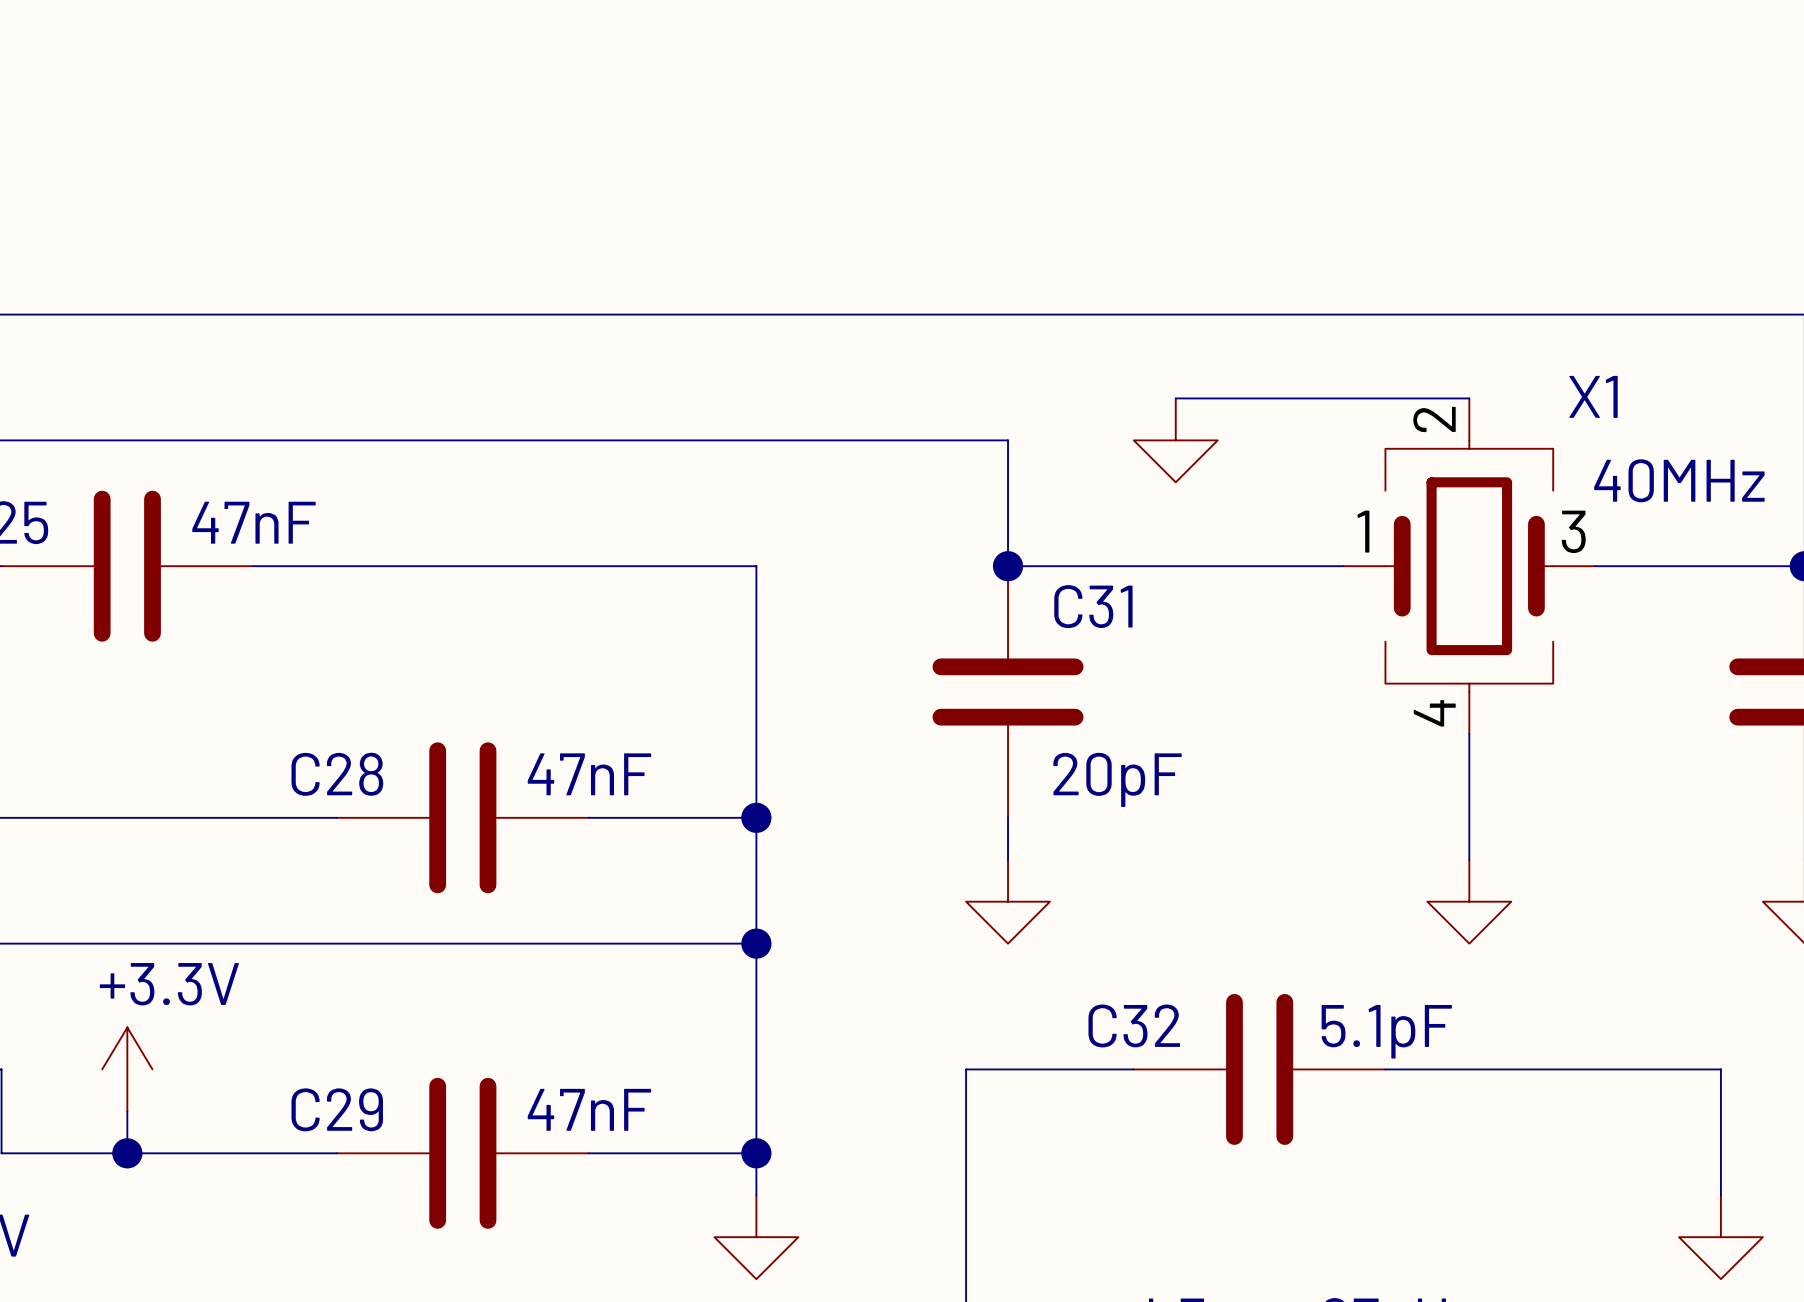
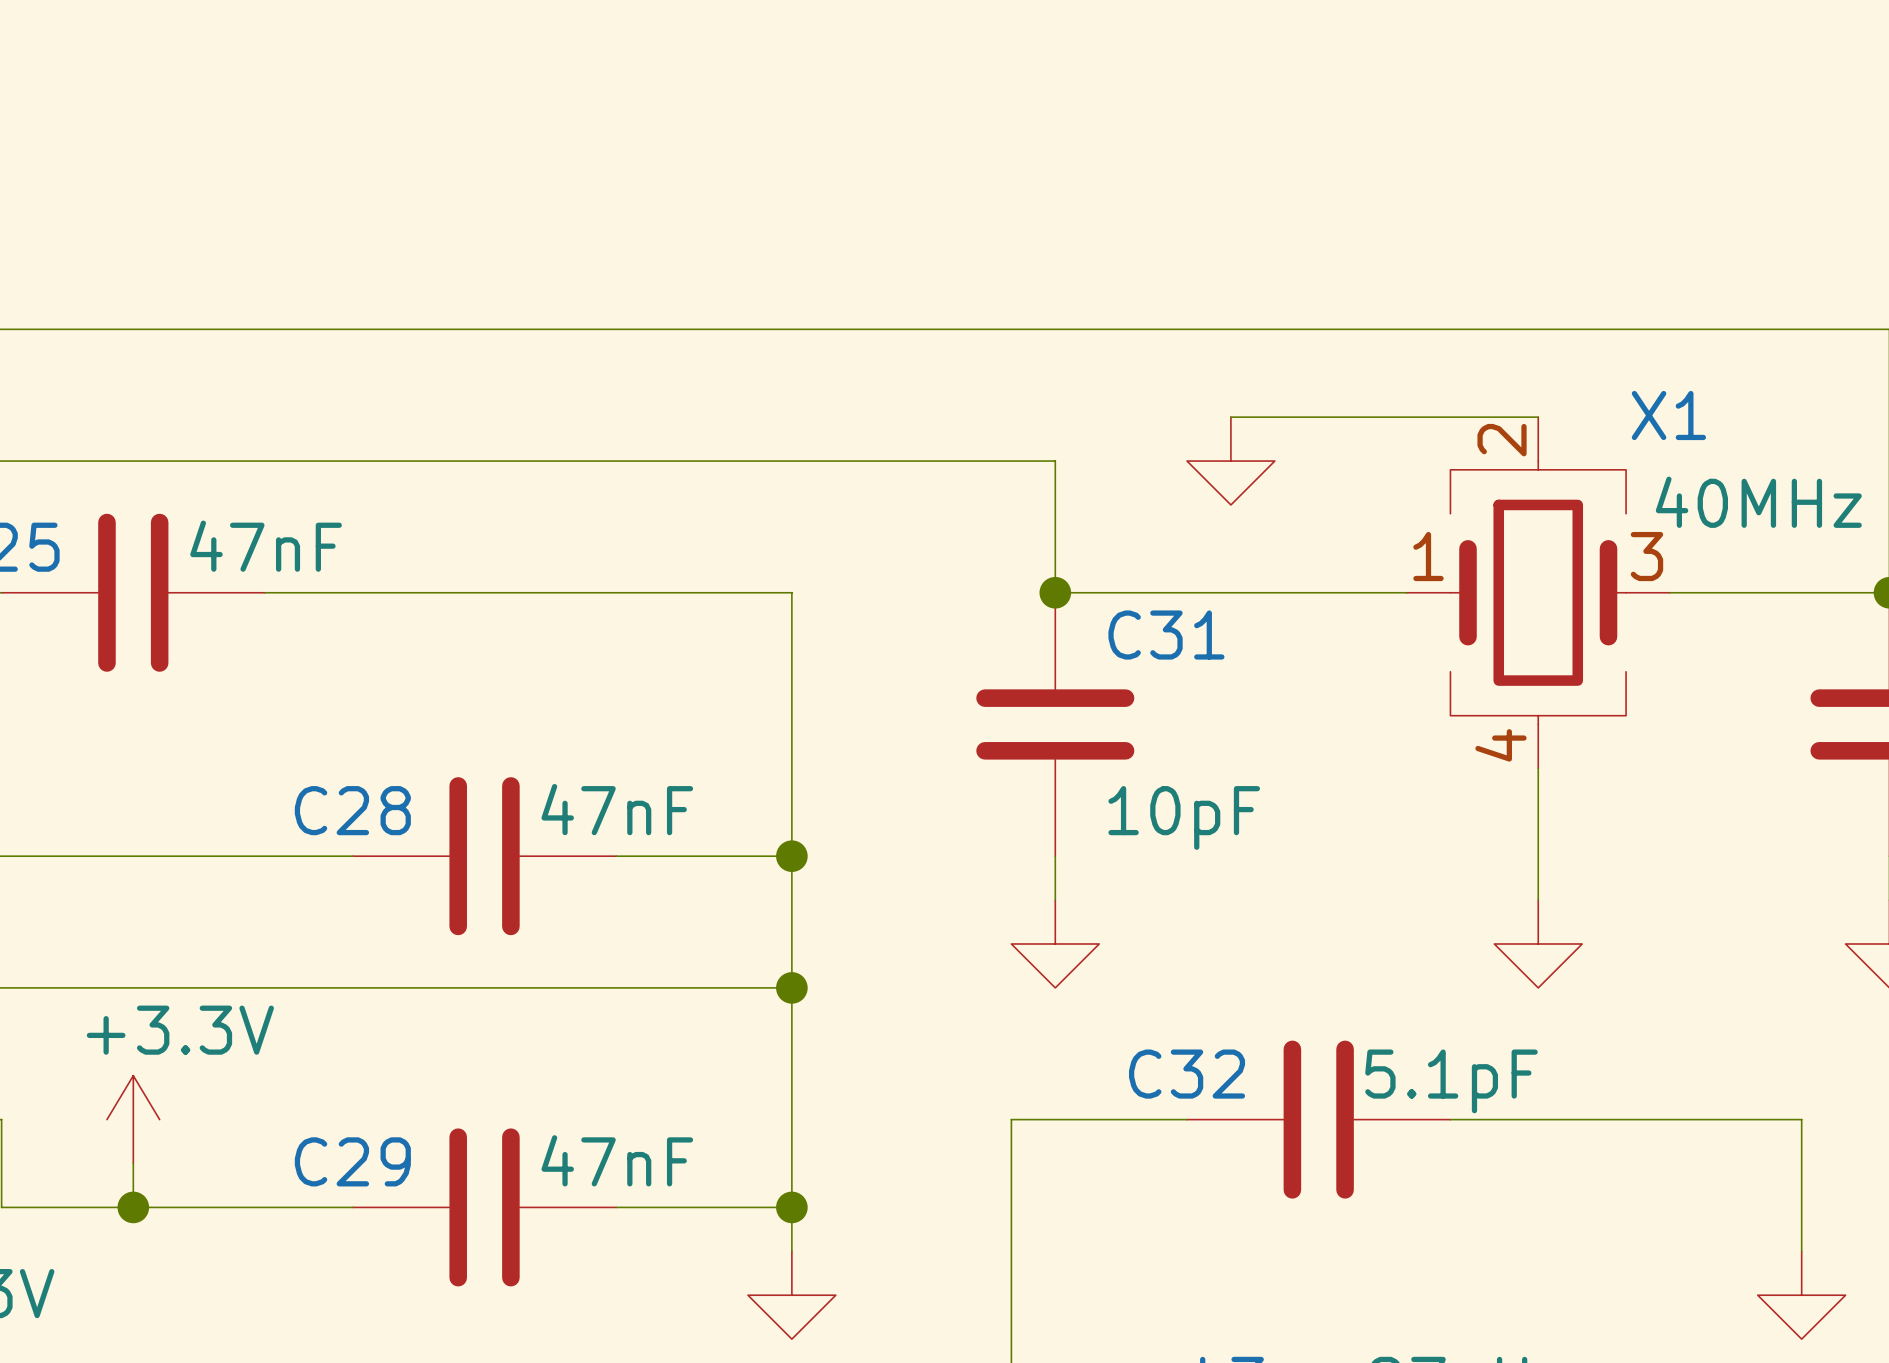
C31 value: 20pF (1117, 779) -> 10pF (1184, 817)

